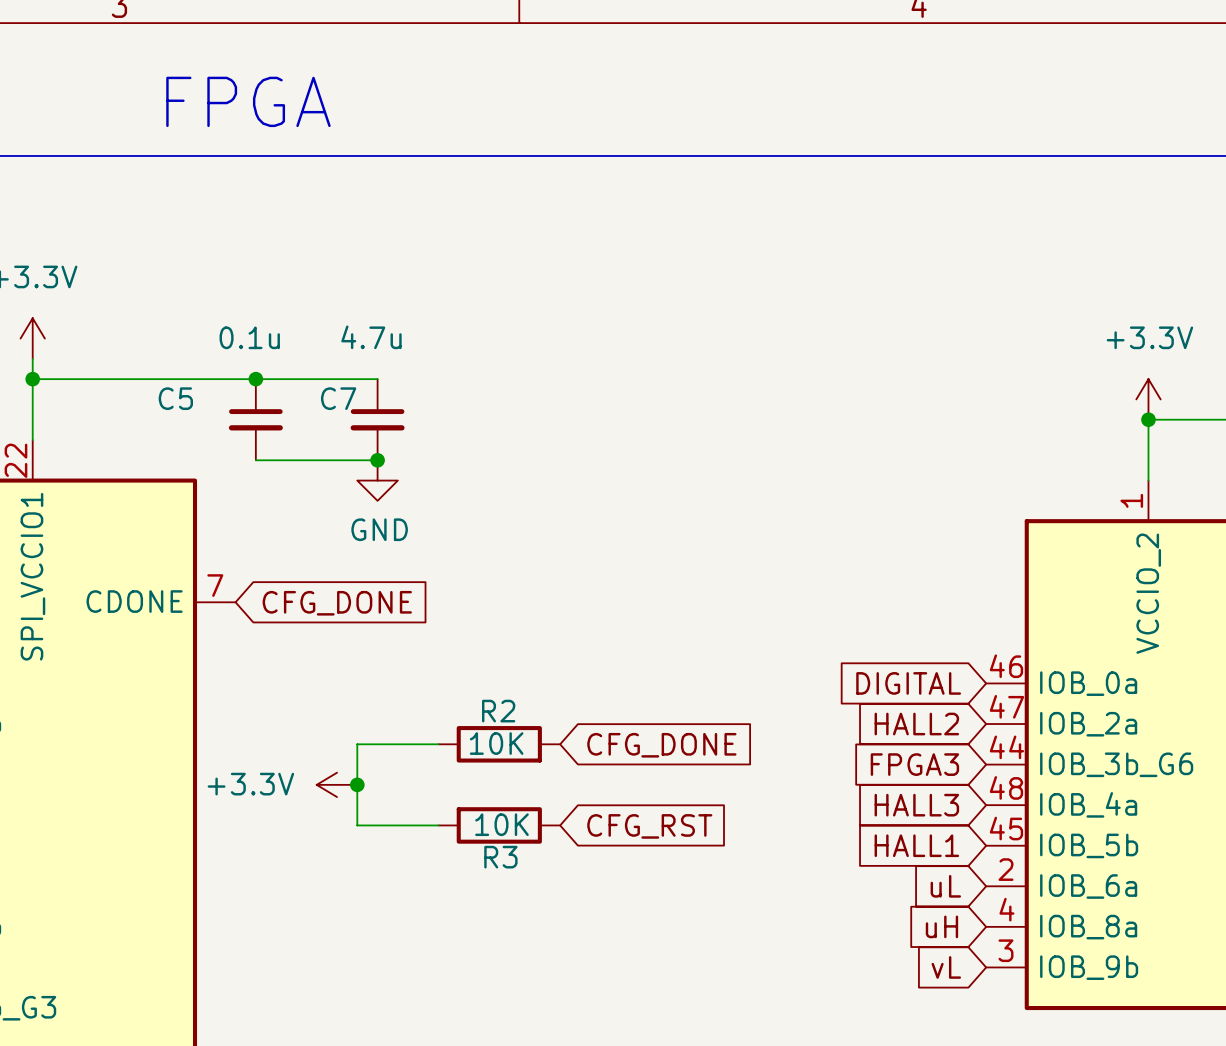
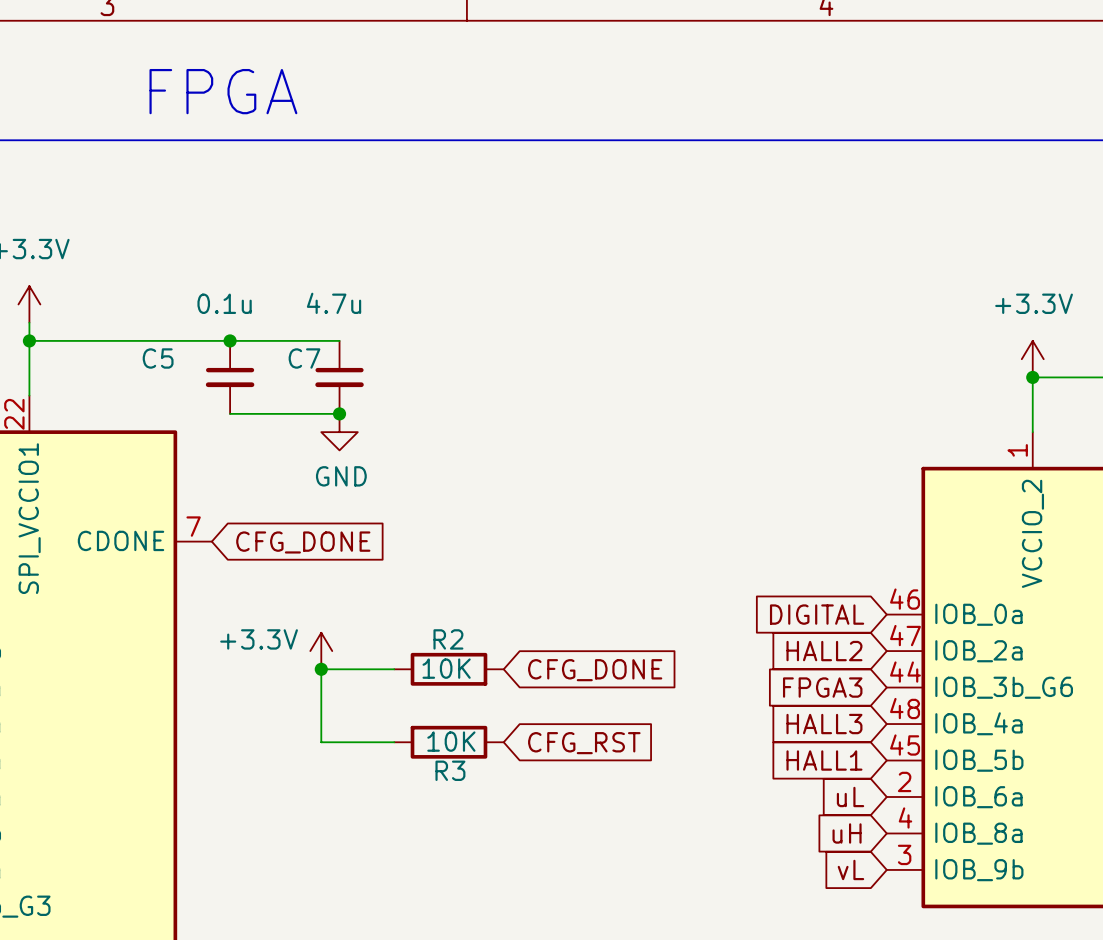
power symbol text position: +3.3V (250, 784) -> +3.3V (259, 639)
power symbol rotation: 0° (337, 784) -> 90° clockwise (321, 651)
power symbol position: +3.3V (337, 784) -> +3.3V (321, 651)
junction position: (357, 784) -> (321, 669)

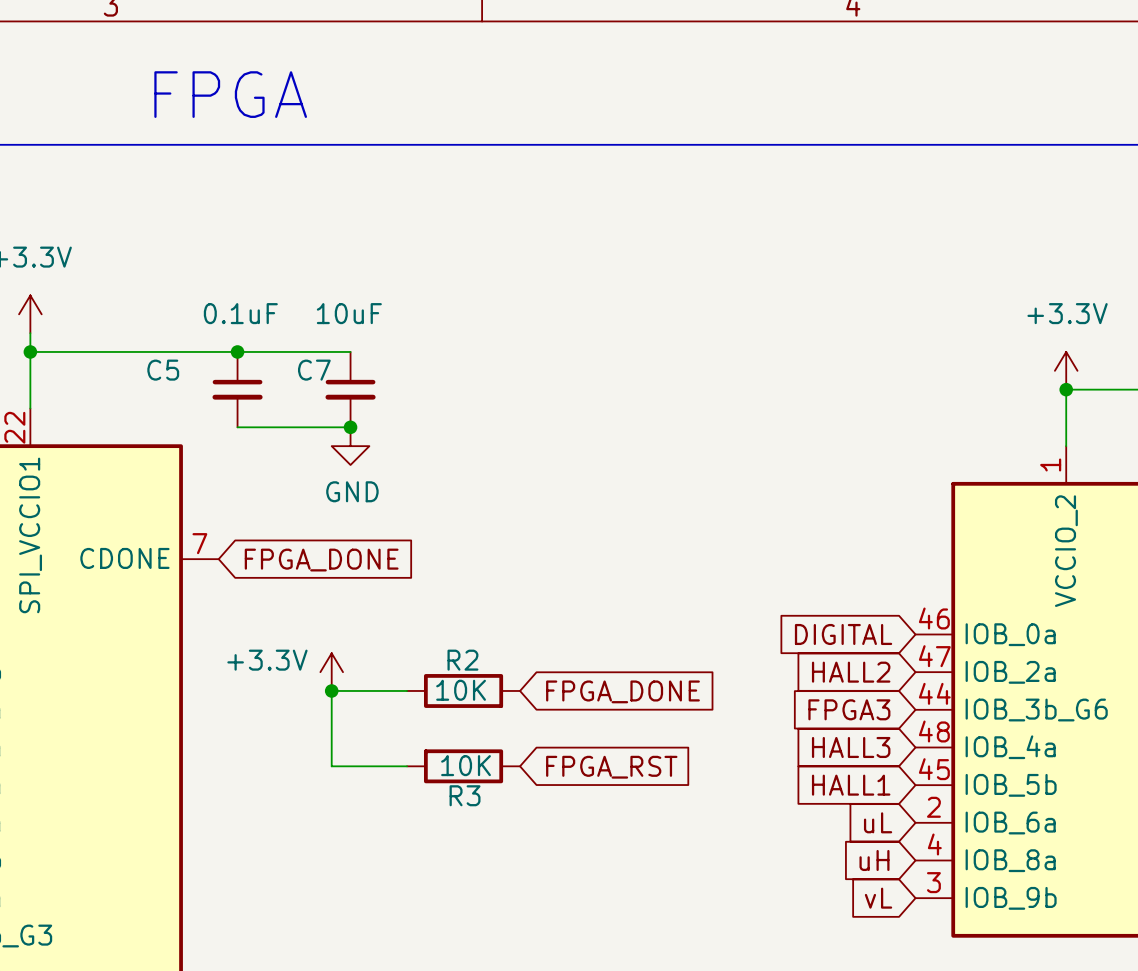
C5 value: 0.1u (224, 303) -> 0.1uF (240, 313)
C7 value: 4.7u (334, 303) -> 10uF (349, 313)
global label: CFG_DONE (303, 542) -> FPGA_DONE (321, 560)
global label: CFG_DONE (595, 670) -> FPGA_DONE (622, 691)
global label: CFG_RST (584, 743) -> FPGA_RST (611, 767)

